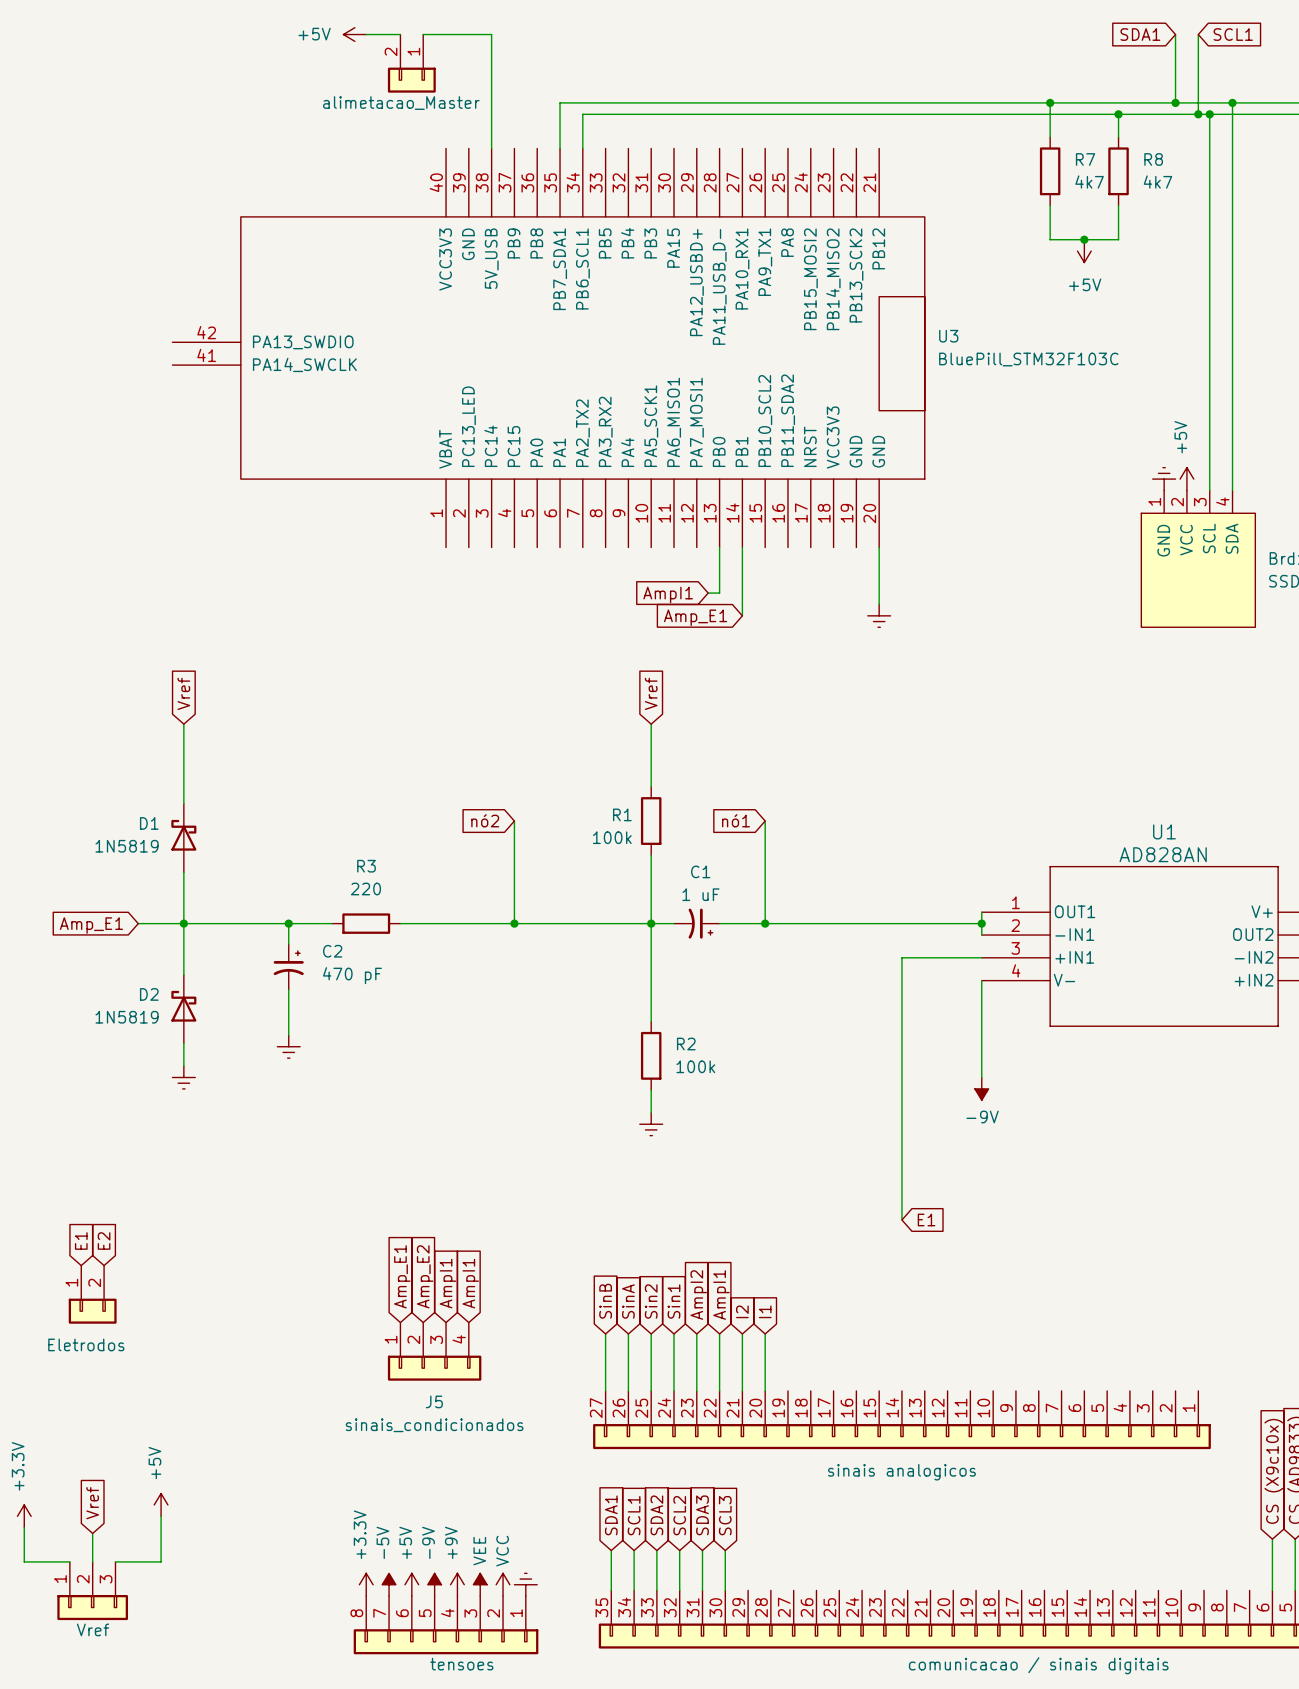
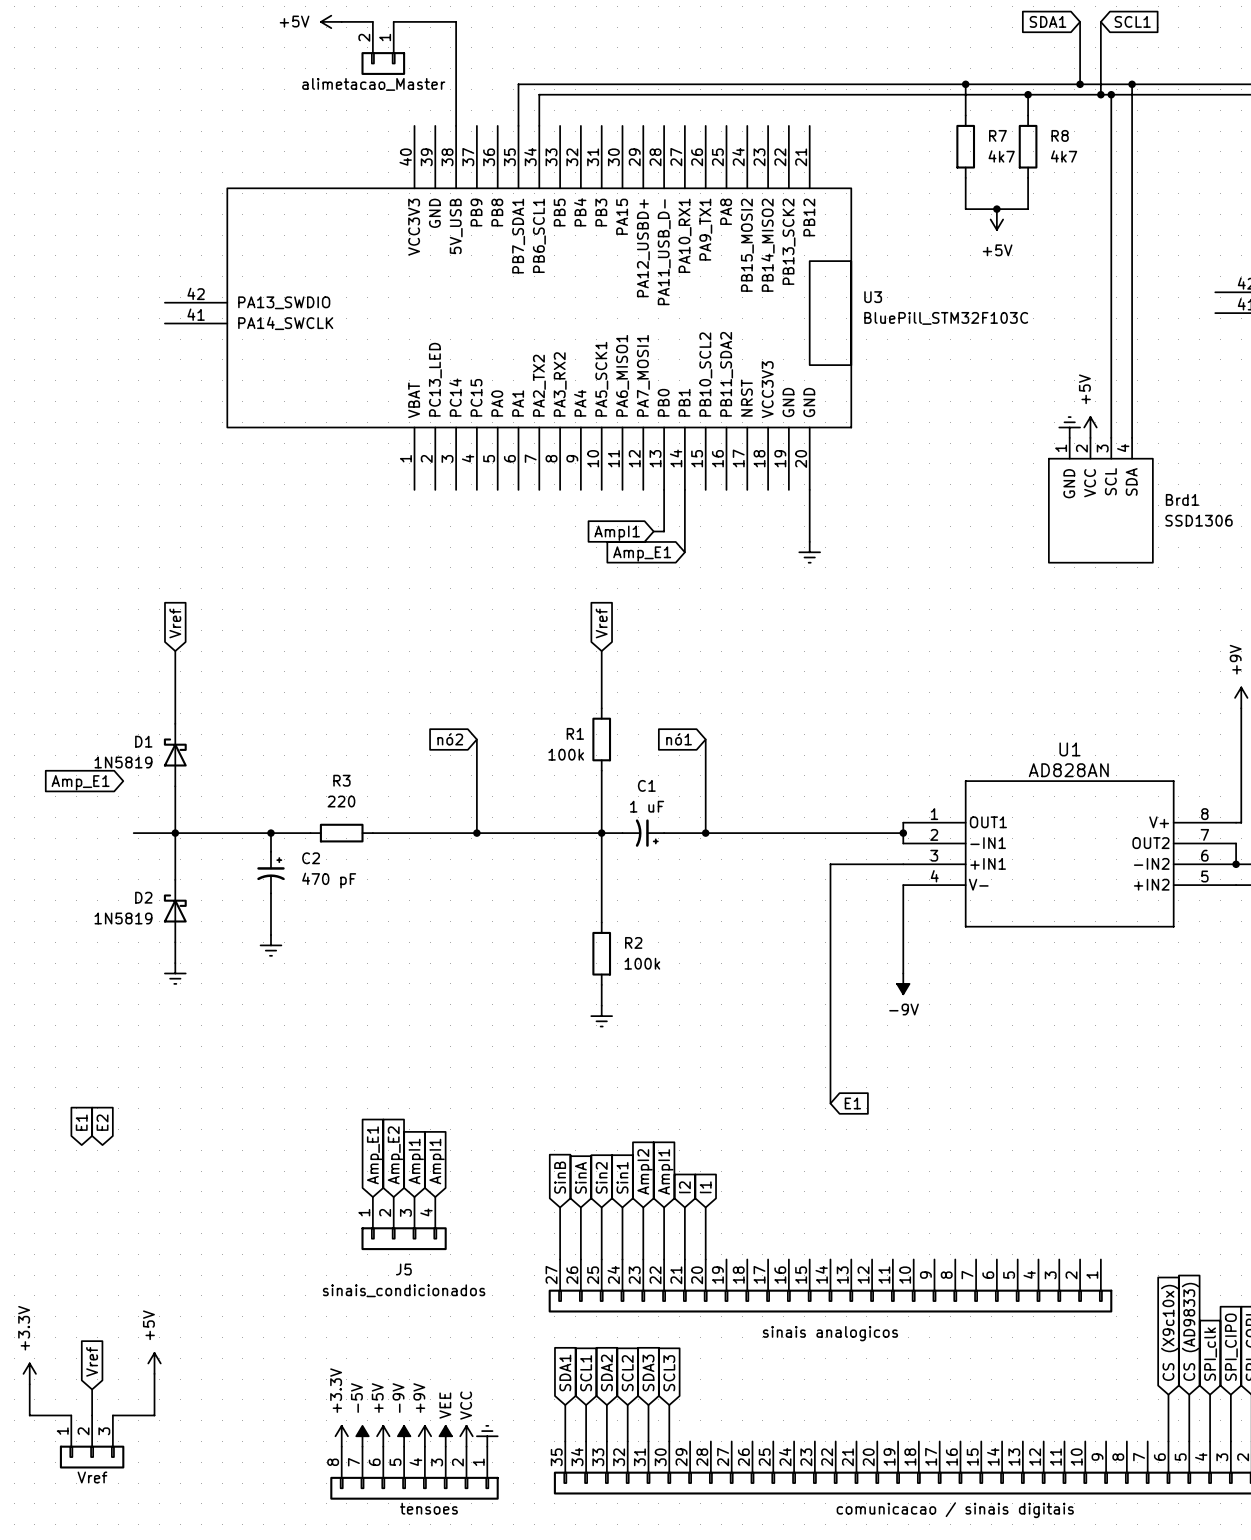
global label position: Amp_E1 (91, 925) -> Amp_E1 (80, 782)
part: Eletrodos (92, 1294) -> none

